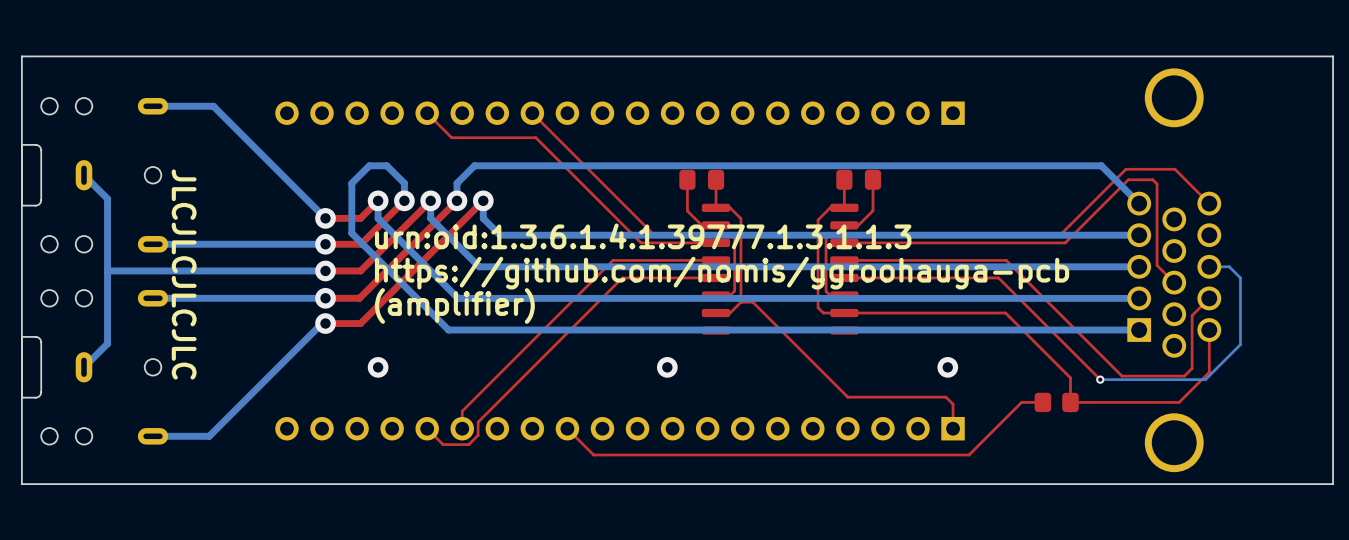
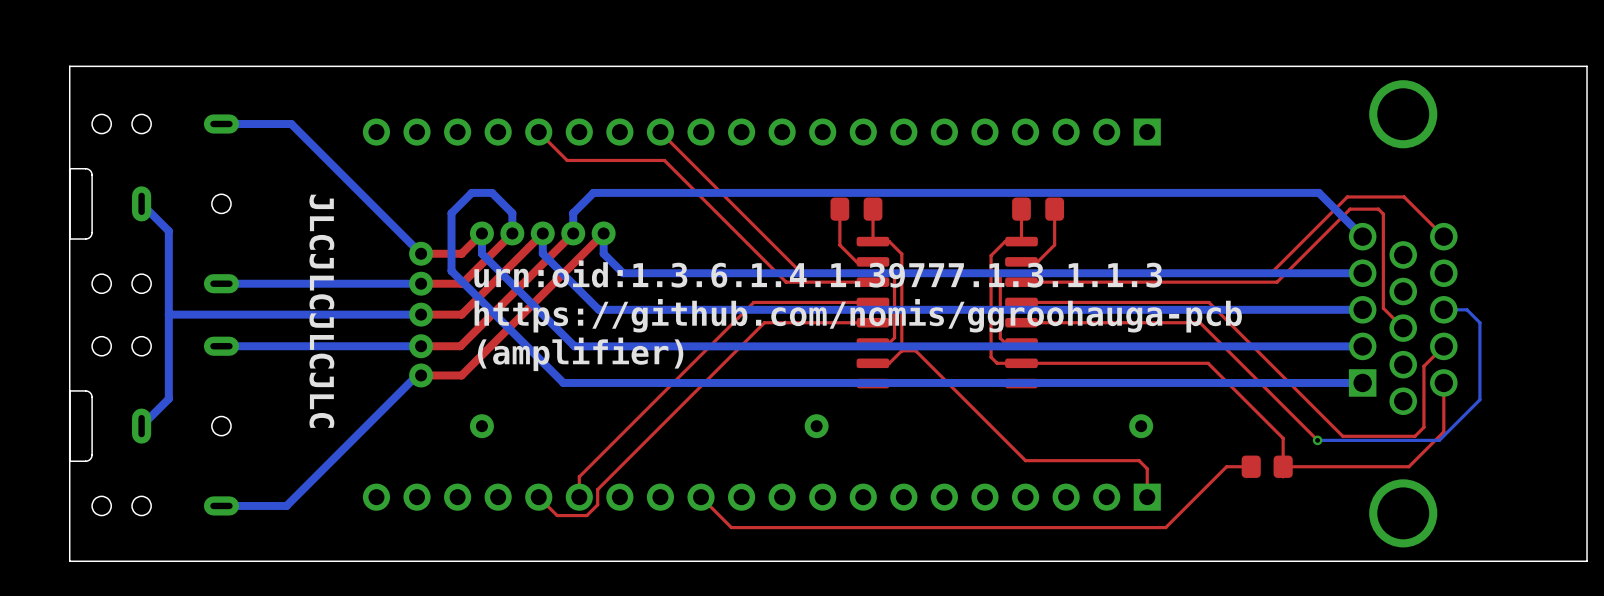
text position: JLCJLCJLCJLC (184, 274) -> JLCJLCJLCJLC (321, 311)

